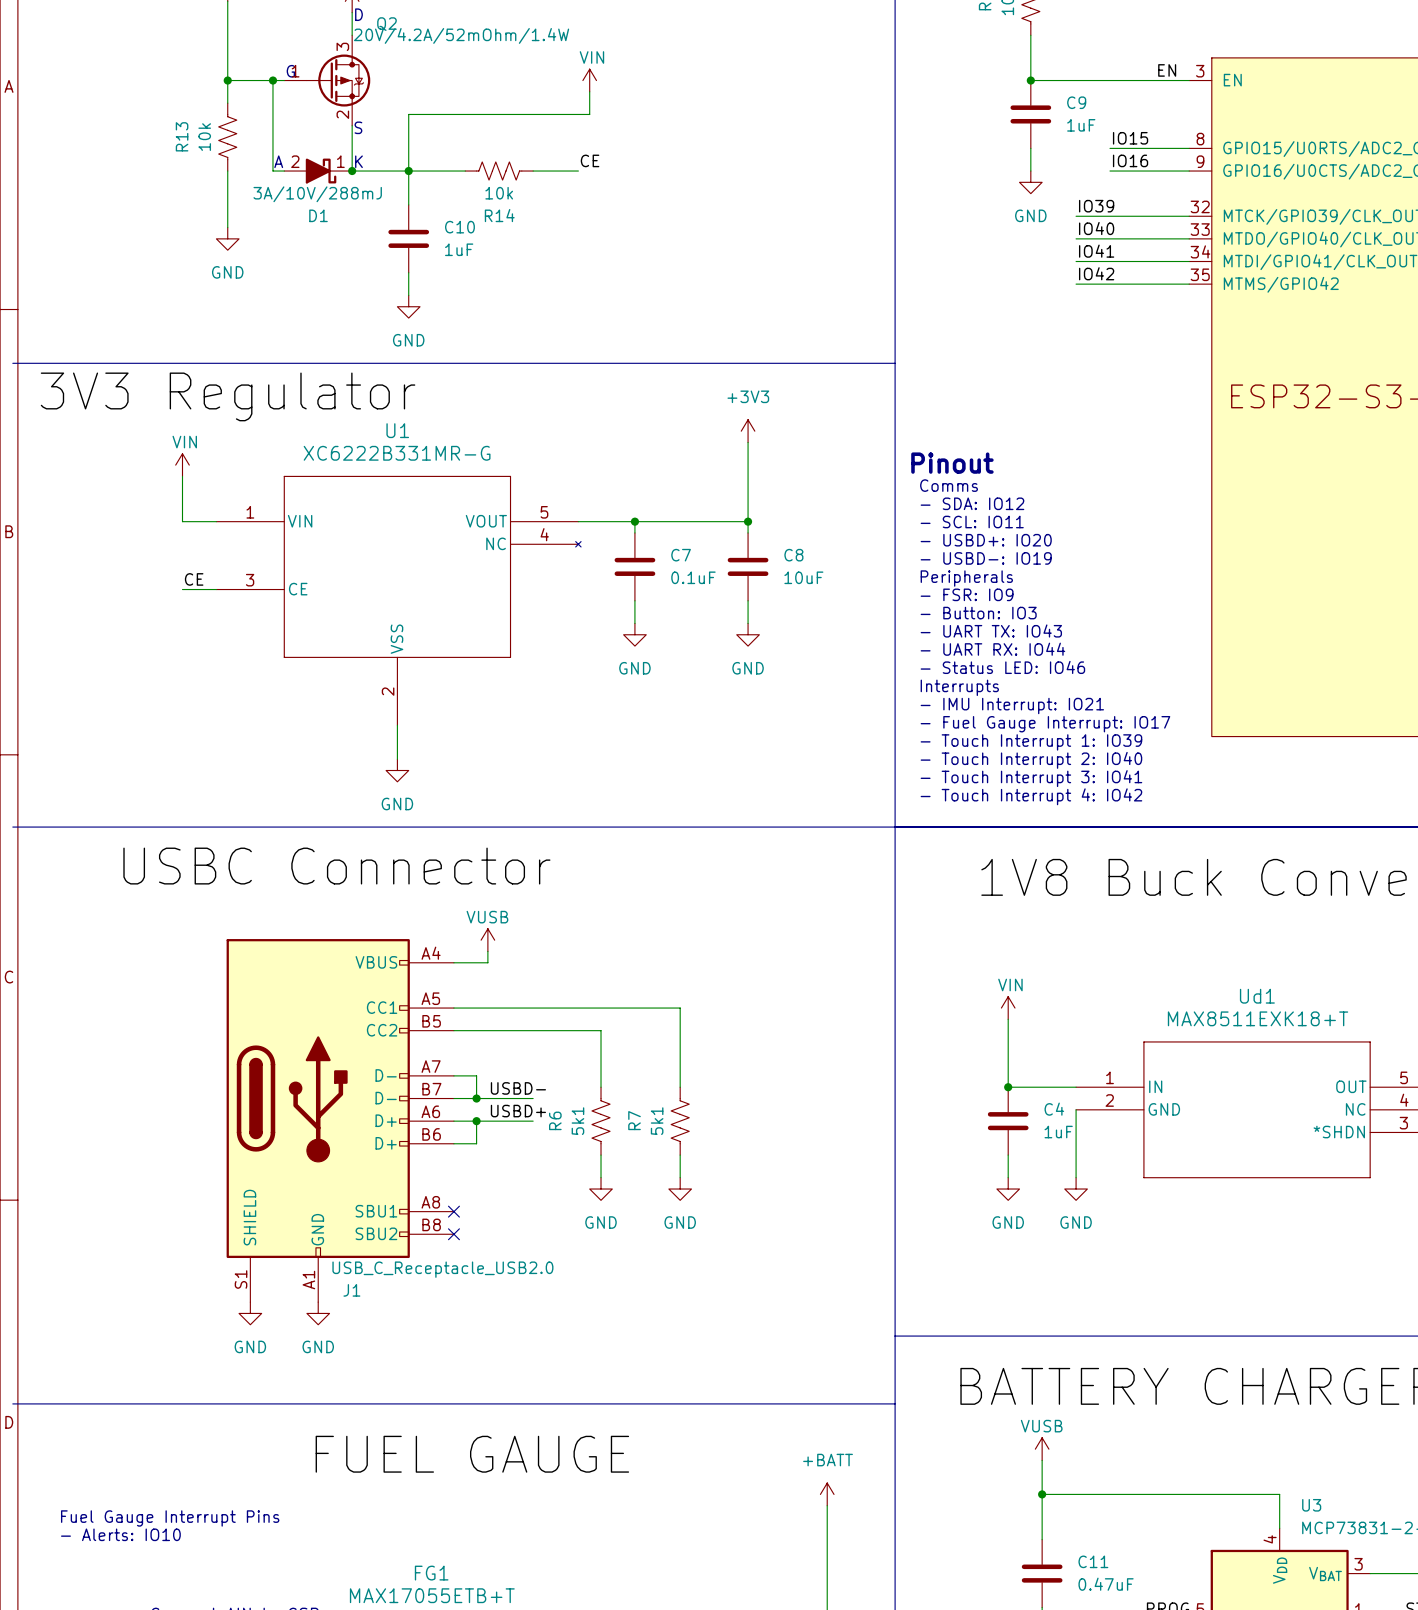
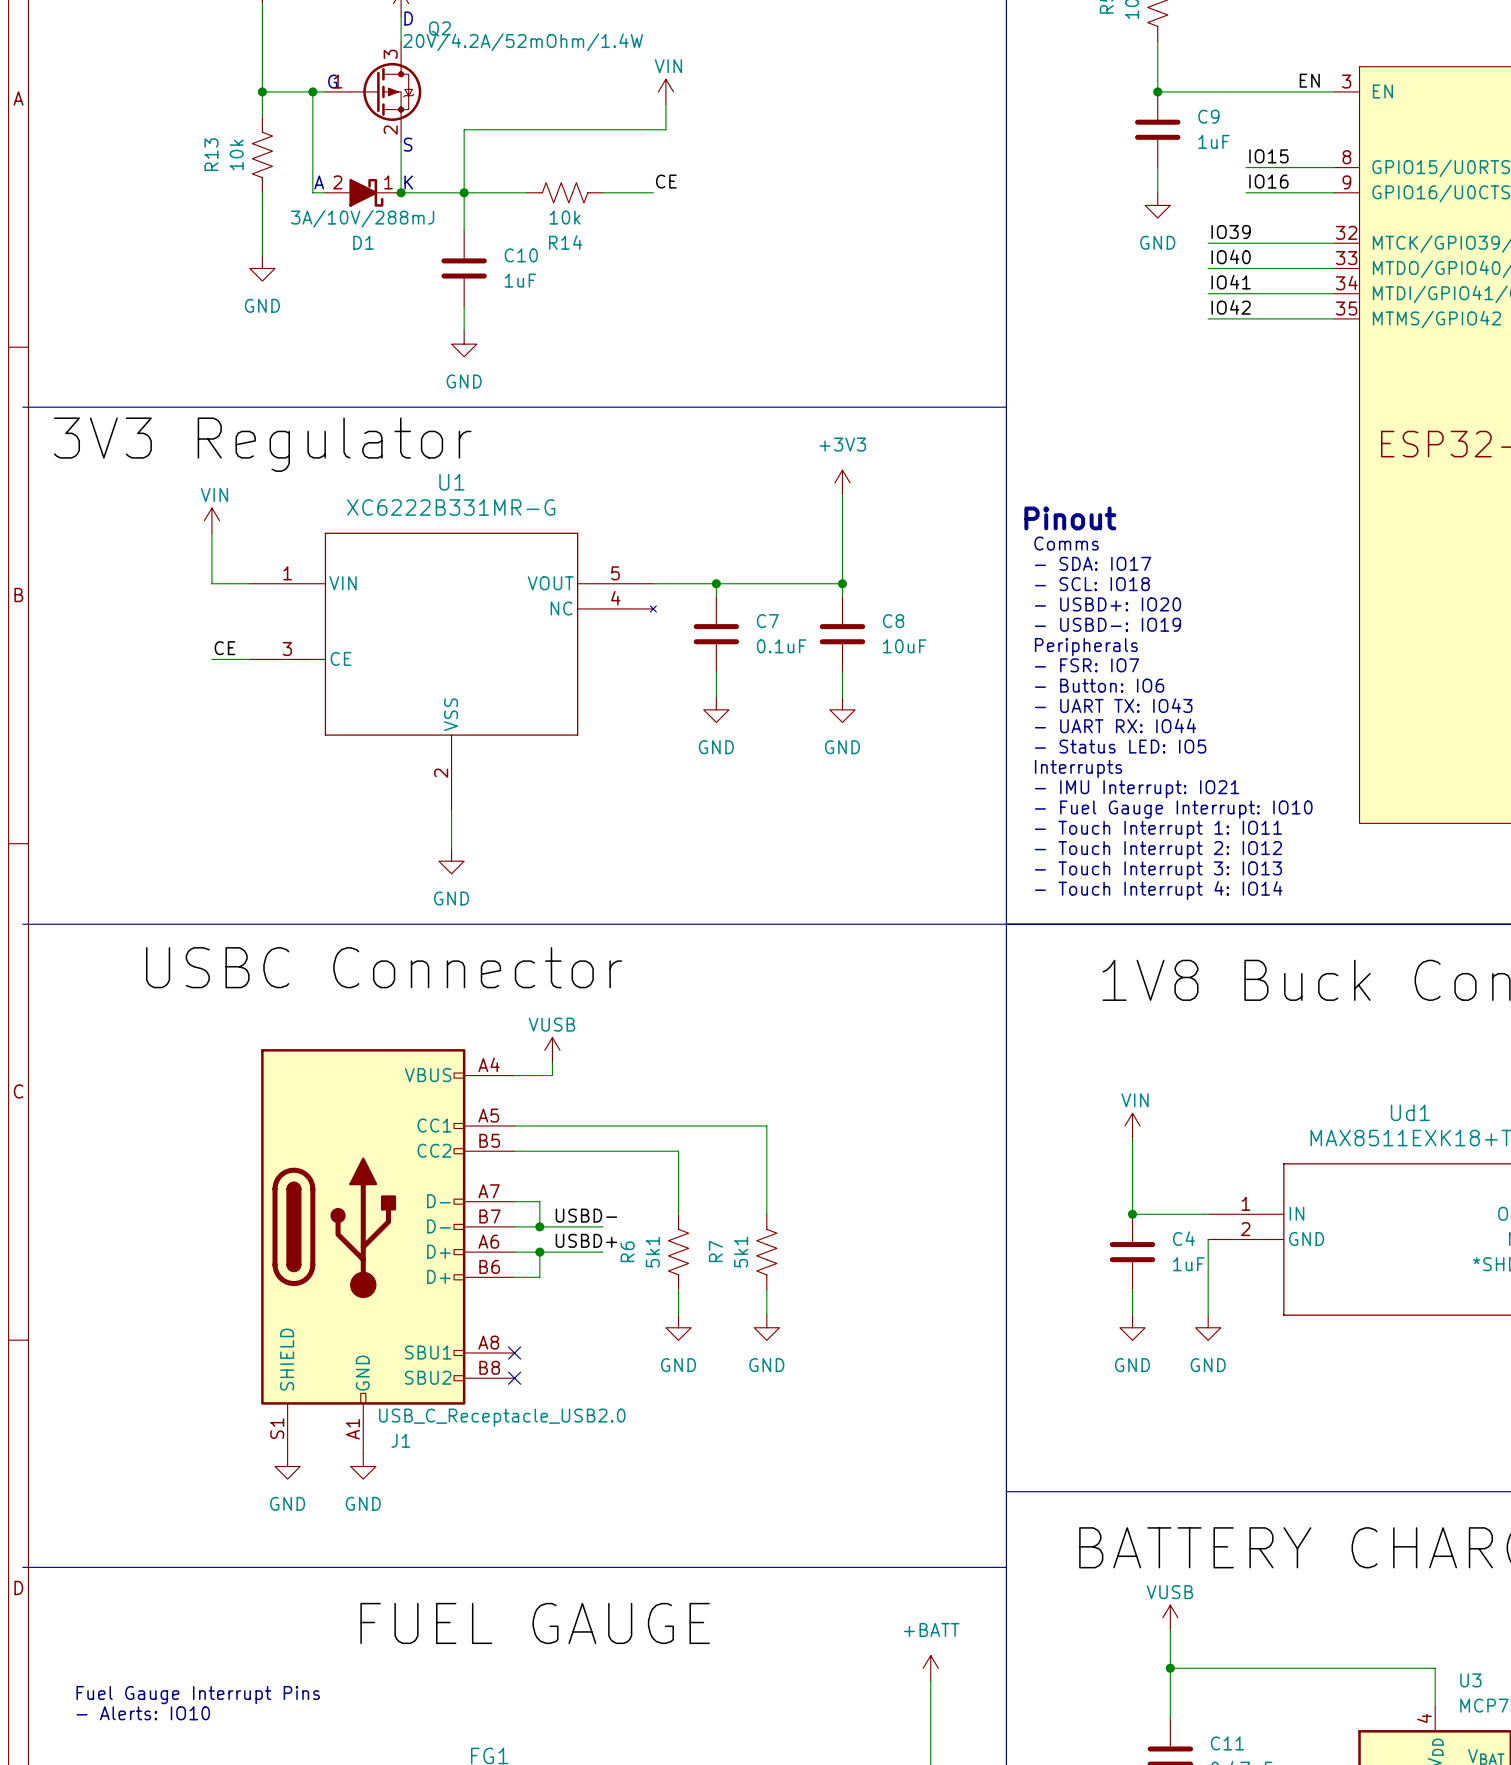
text: - SDA: IO12 (972, 503) -> - SDA: IO17 (1092, 563)
text: - SCL: IO11 (972, 522) -> - SCL: IO18 (1092, 584)
text: - FSR: IO9 (967, 594) -> - FSR: IO7 (1086, 665)
text: - Button: IO3 (978, 613) -> - Button: IO6 (1099, 685)
text: - Status LED: IO46 (1002, 667) -> - Status LED: IO5 (1120, 746)
text: - Fuel Gauge Interrupt: IO17 (1045, 724) -> - Fuel Gauge Interrupt: IO10 (1173, 809)
text: - Touch Interrupt 1: IO39 (1031, 742) -> - Touch Interrupt 1: IO11 (1158, 829)
text: - Touch Interrupt 2: IO40 (1031, 760) -> - Touch Interrupt 2: IO12 (1158, 850)
text: - Touch Interrupt 3: IO41 (1031, 778) -> - Touch Interrupt 3: IO13 (1158, 870)
text: - Touch Interrupt 4: IO42 (1031, 796) -> - Touch Interrupt 4: IO14 (1158, 890)

